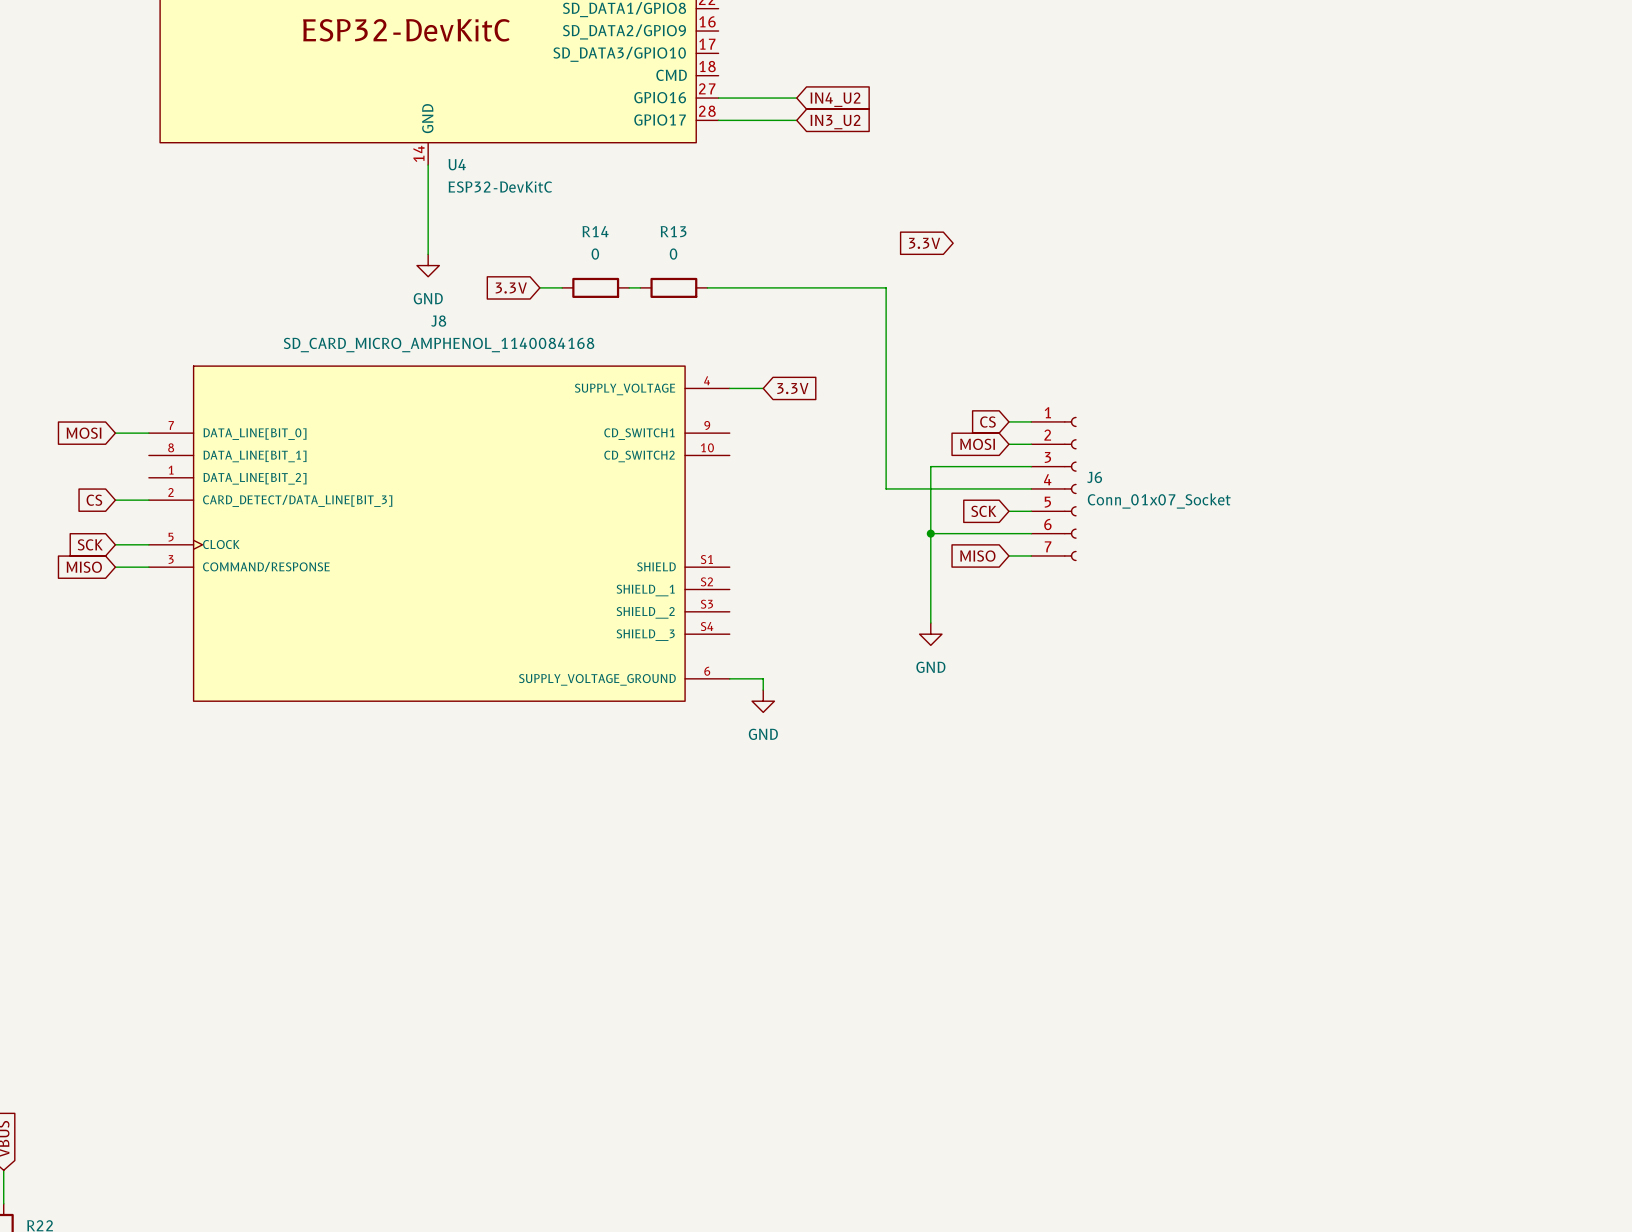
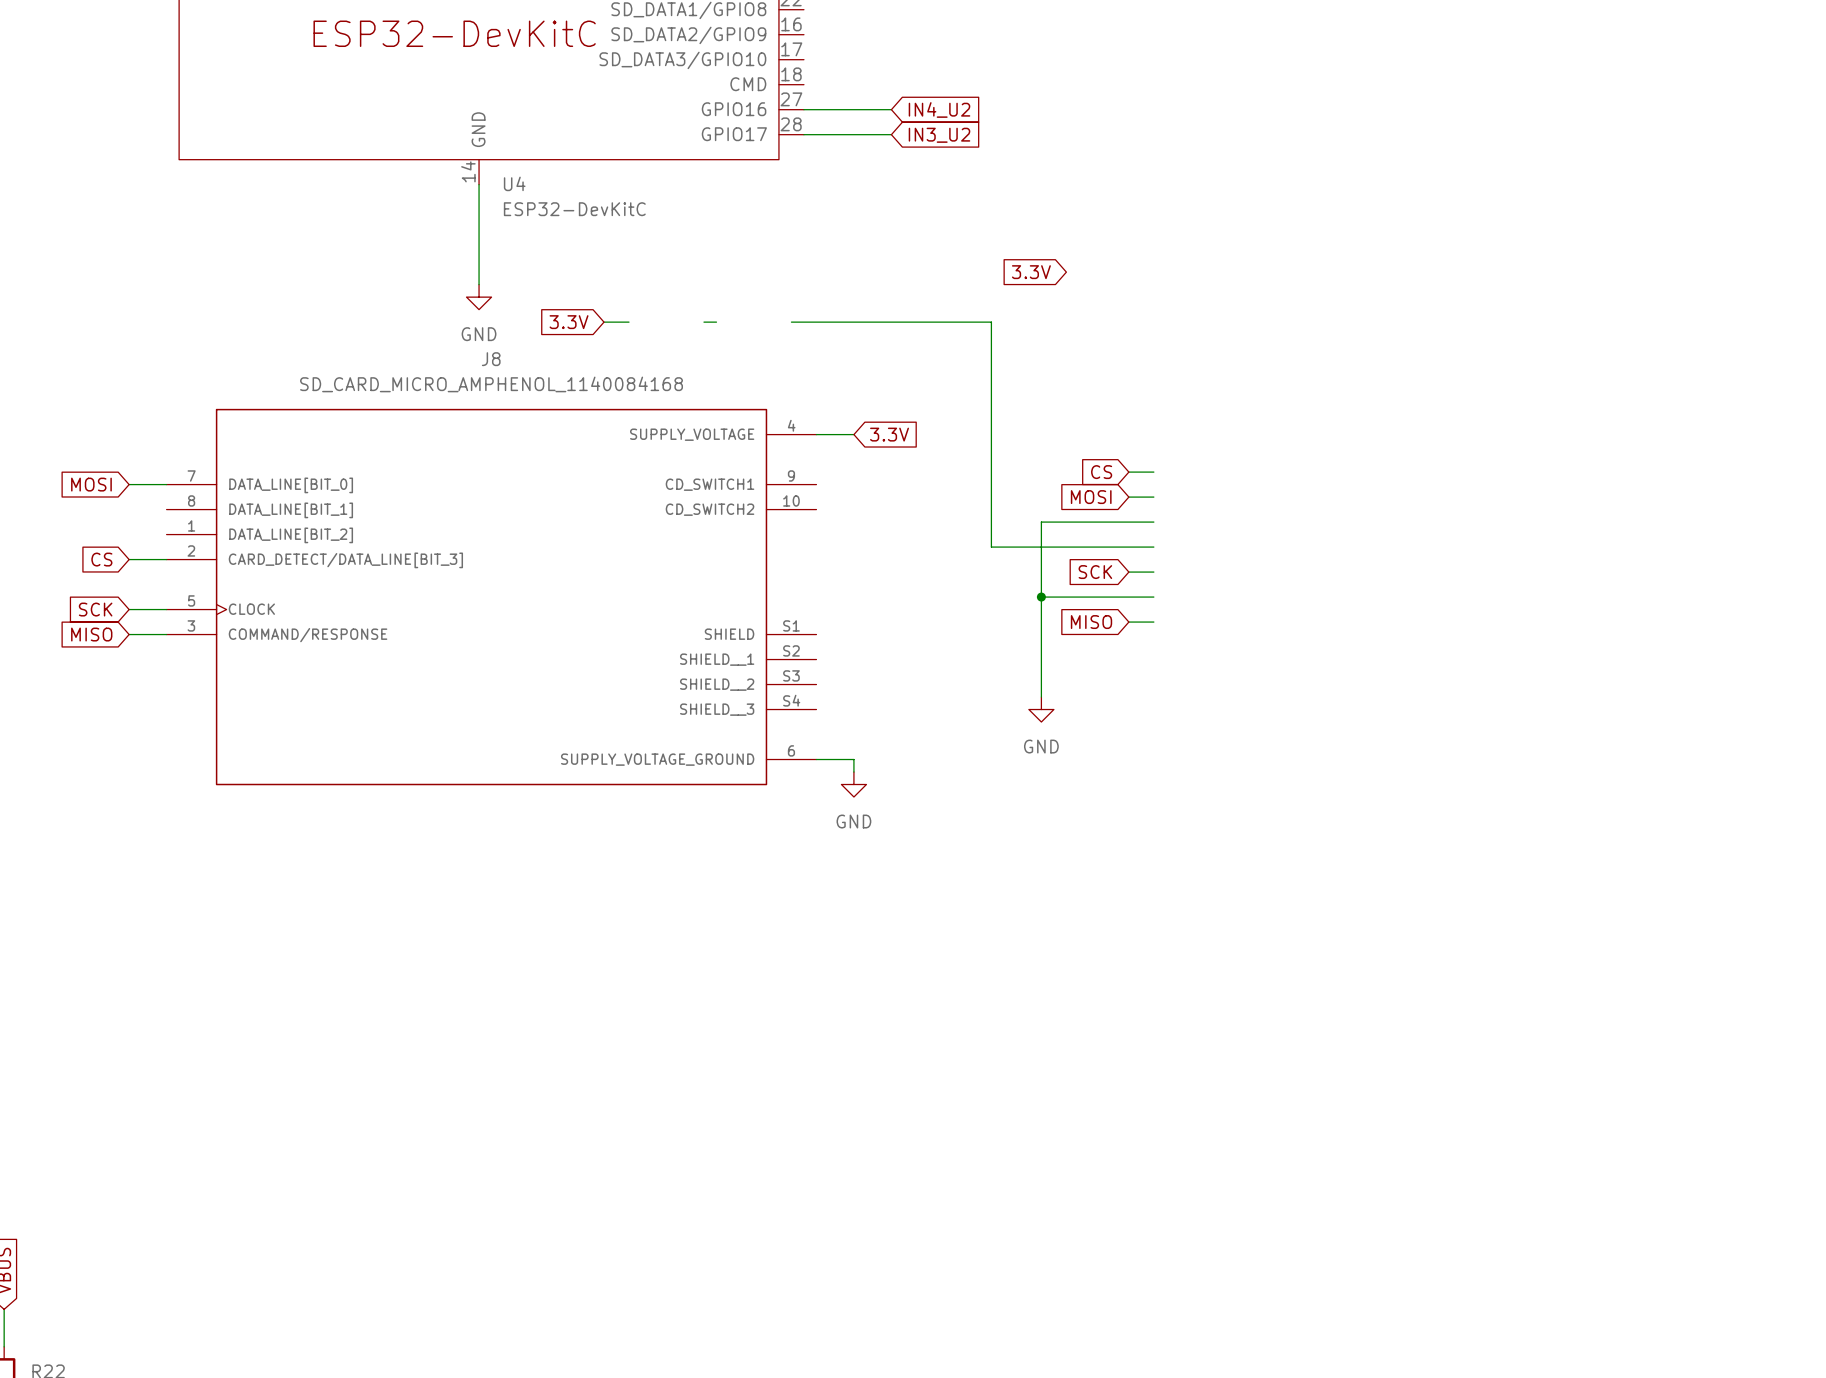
R14: 0 (595, 287) -> none
R13: 0 (673, 287) -> none
J6: Conn_01x07_Socket (1053, 488) -> none

